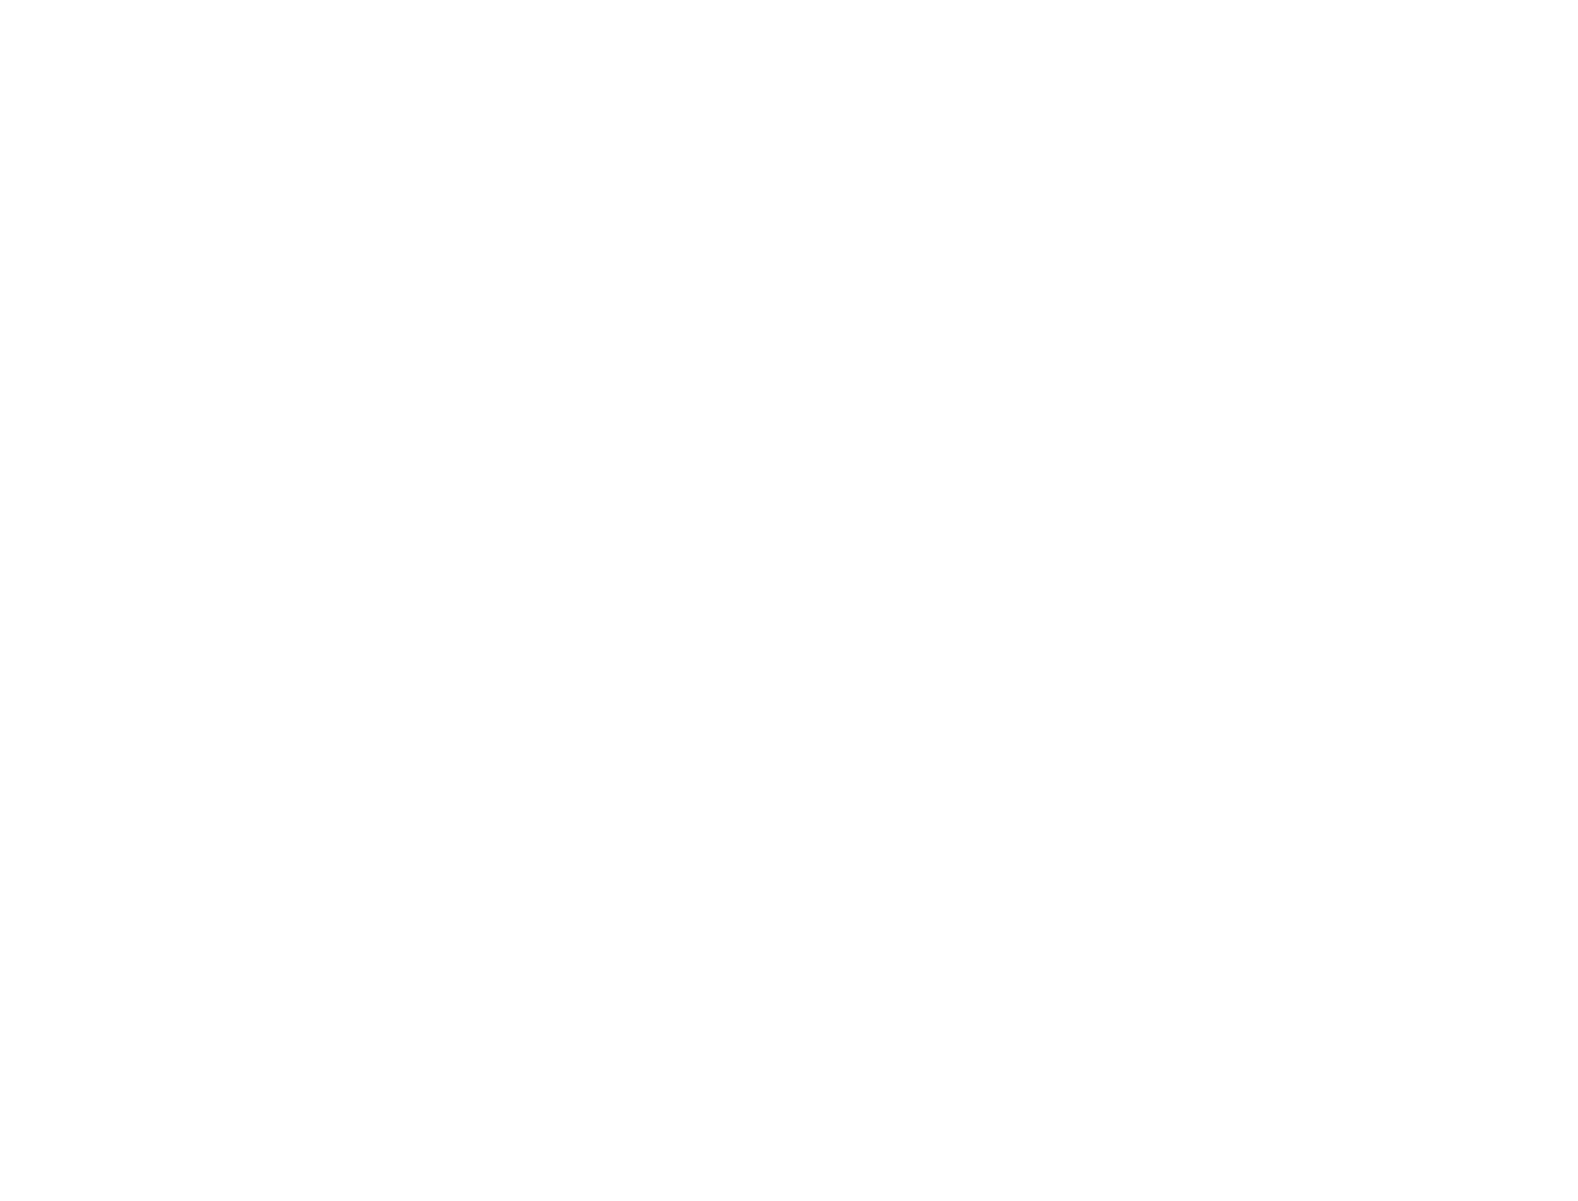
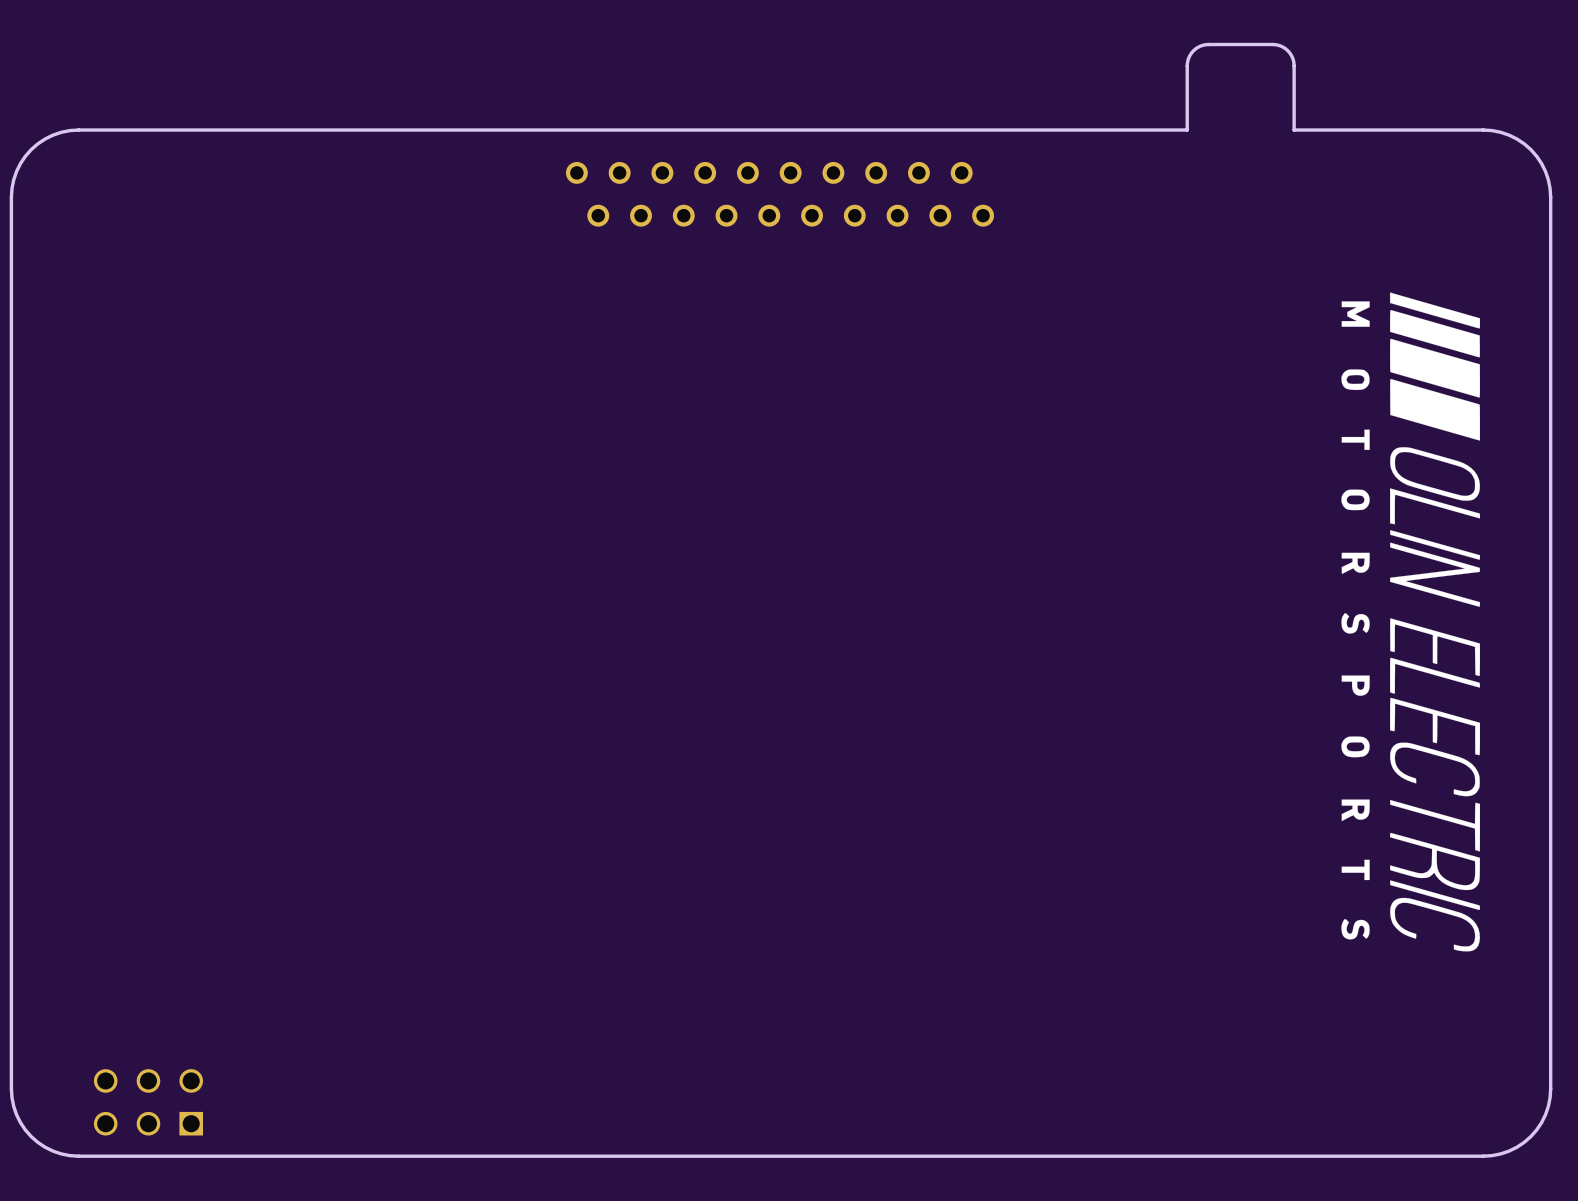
board edge: none -> (1272, 44) (1205, 44) (1193, 50) (1187, 63) (1187, 130) (78, 130) (52, 135) (37, 143) (20, 163) (13, 179) (11, 197) (11, 1088) (16, 1114) (25, 1129) (37, 1142) (52, 1151) (78, 1156) (1483, 1156) (1500, 1153) (1524, 1142) (1536, 1129) (1545, 1114) (1550, 1088) (1550, 197) (1548, 179) (1541, 163) (1530, 149) (1517, 139) (1492, 130) (1294, 130) (1293, 60) (1285, 48) (1272, 44)
part: none -> (779, 194)
drawing: none -> [1341, 292, 1481, 952]
part: none -> (148, 1102)

